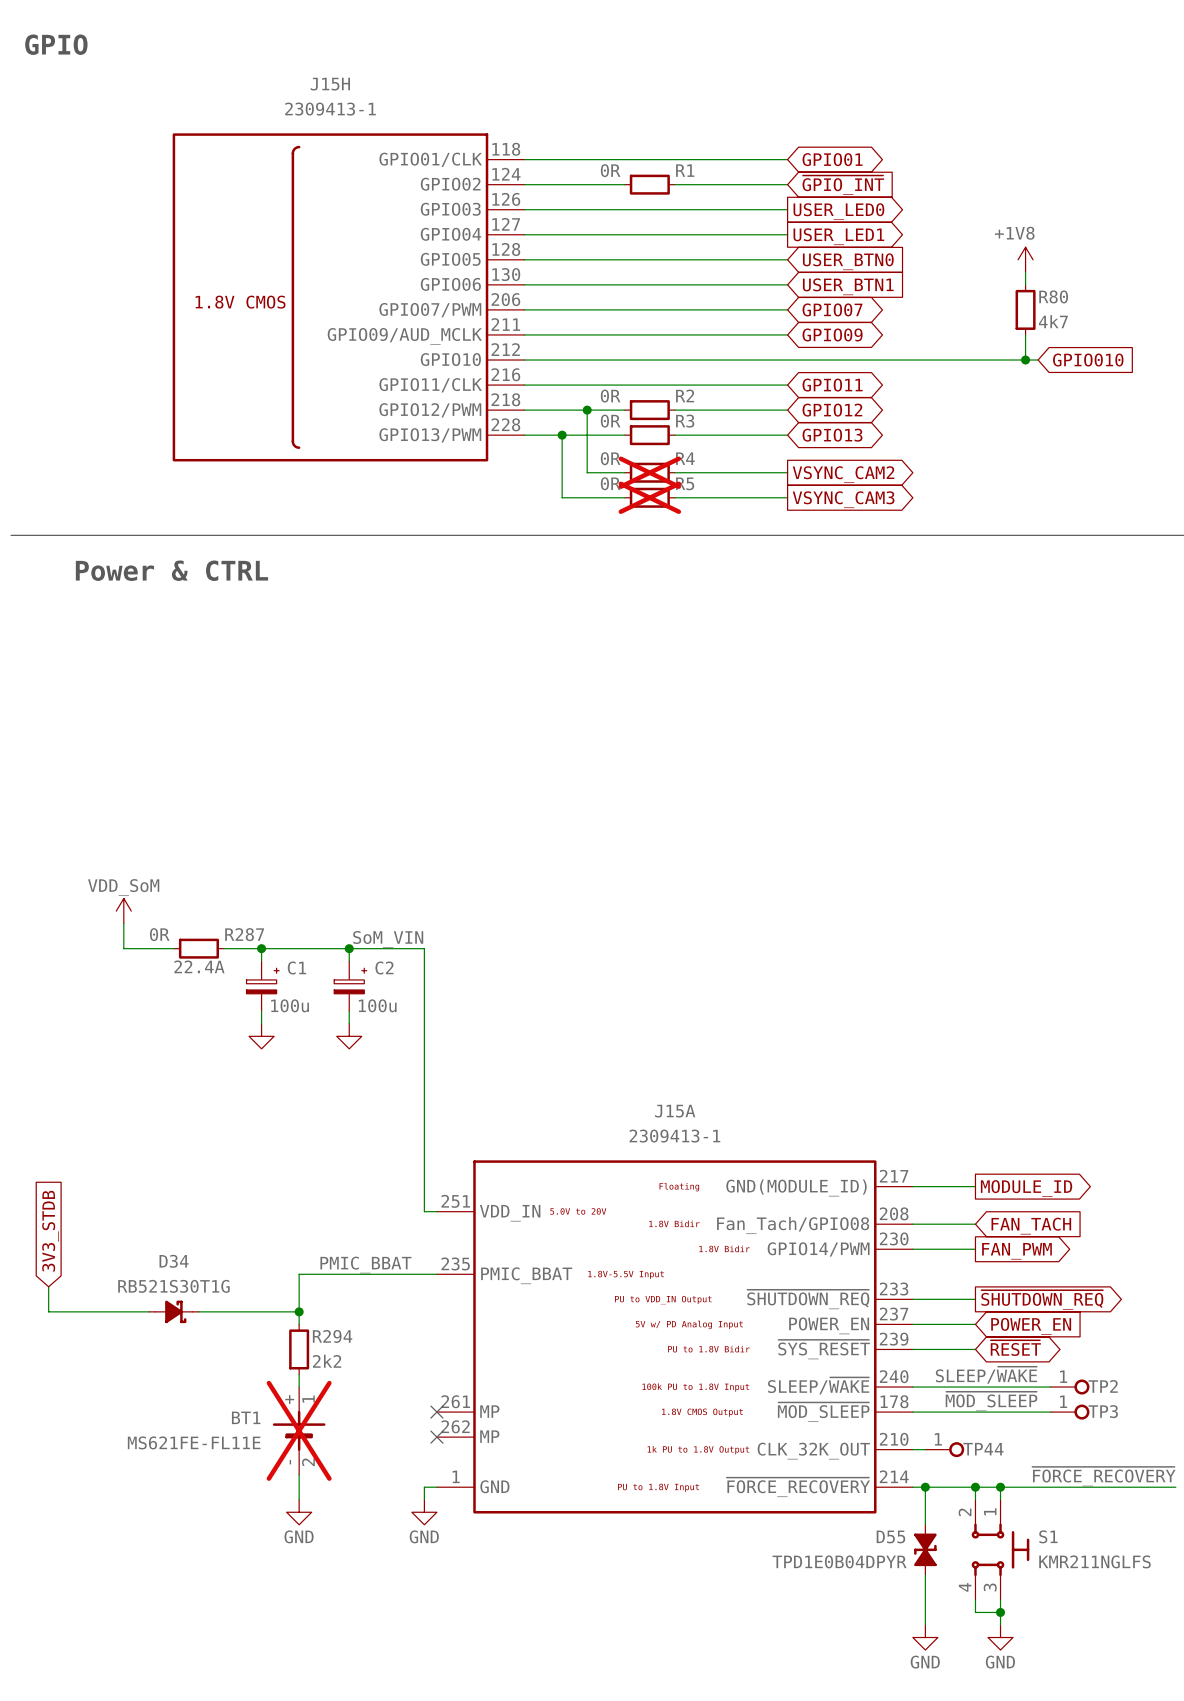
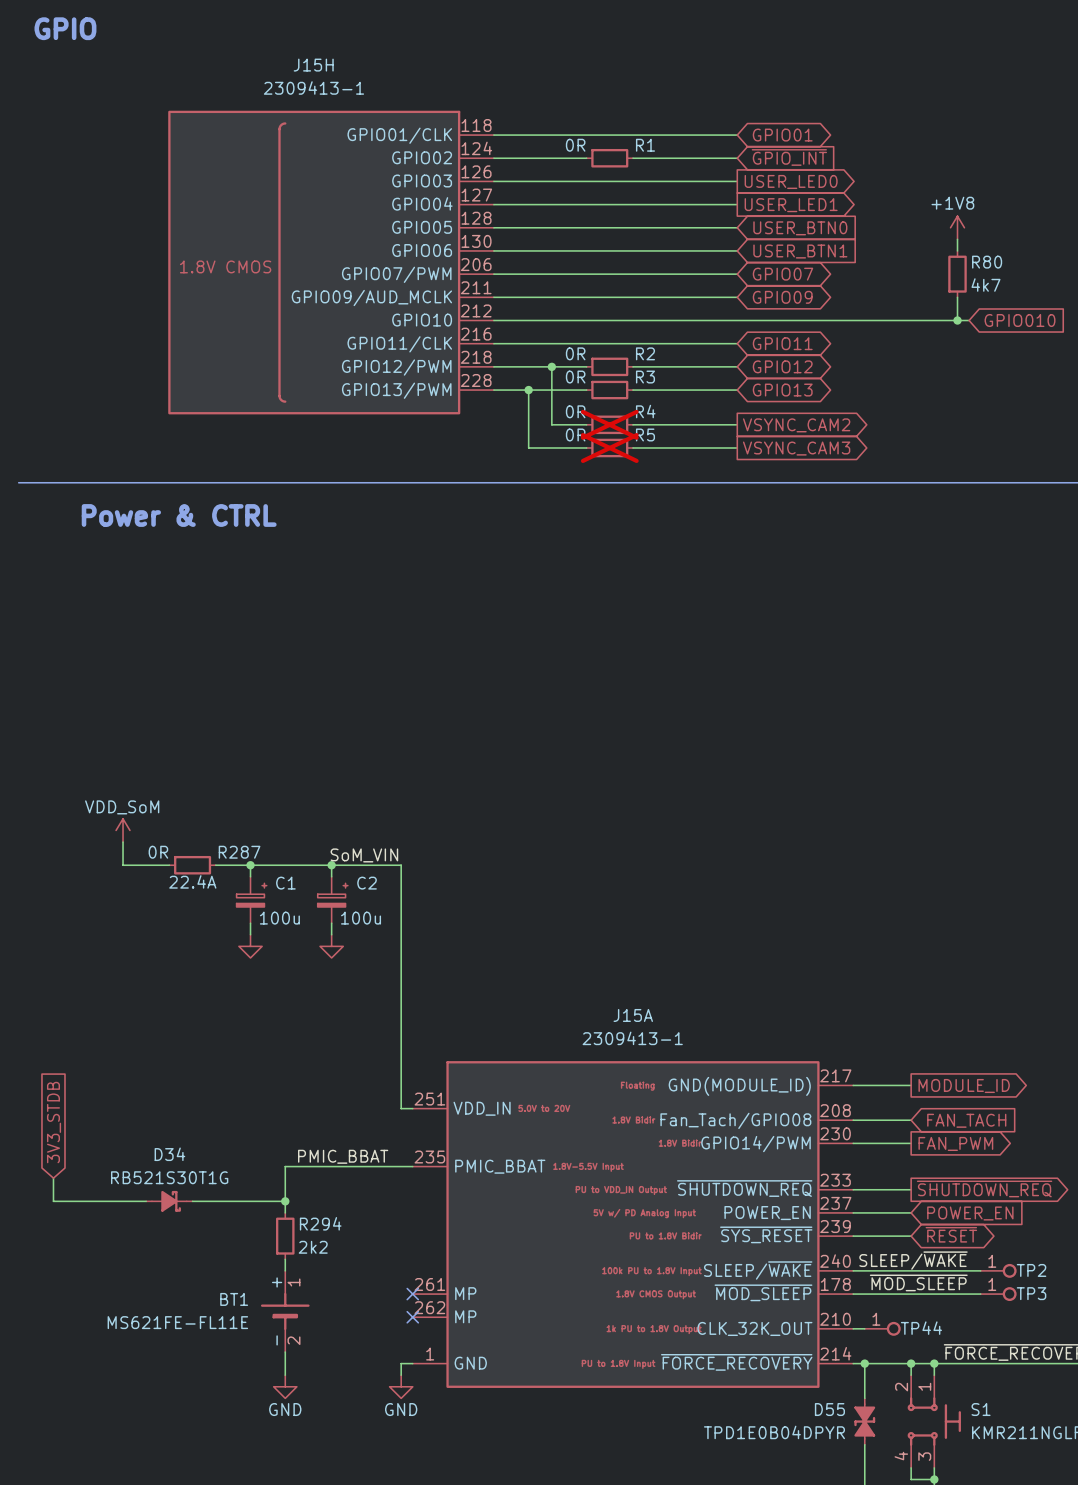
BT1 do-not-place cross: (299, 1430) -> none

